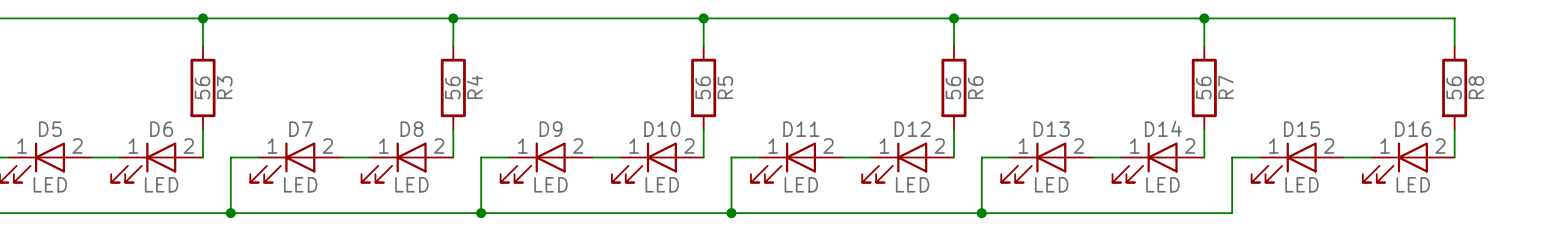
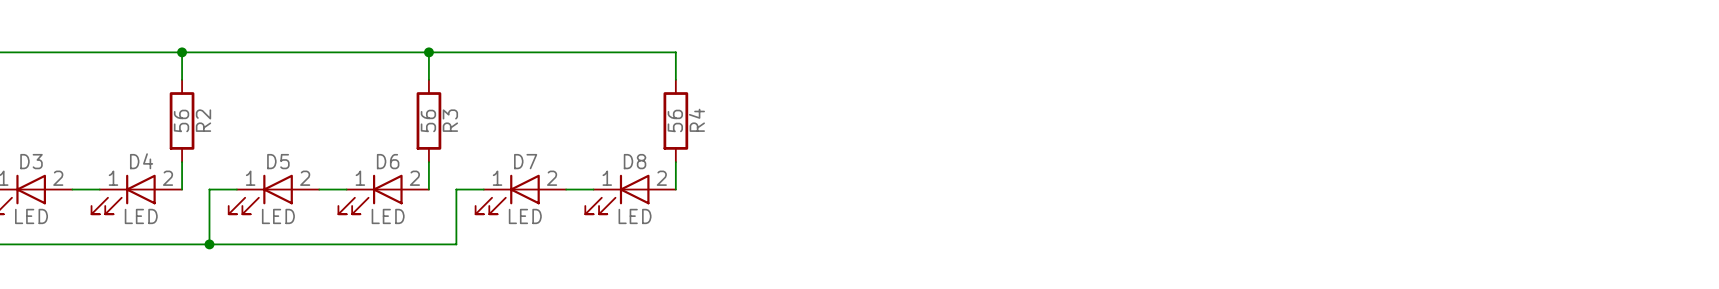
wire: (453, 18) (1454, 18) (1454, 46) -> none
junction: (453, 18) -> none
wire: (703, 18) (703, 46) -> none
junction: (703, 18) -> none
wire: (953, 18) (953, 46) -> none
junction: (953, 18) -> none
wire: (1204, 18) (1204, 46) -> none
junction: (1204, 18) -> none
R5: 56 (703, 87) -> none
R6: 56 (953, 87) -> none
R7: 56 (1204, 87) -> none
R8: 56 (1454, 87) -> none
wire: (703, 129) (703, 157) -> none
wire: (953, 129) (953, 157) -> none
wire: (1204, 129) (1204, 157) -> none
wire: (1454, 129) (1454, 157) -> none
wire: (508, 157) (481, 157) (481, 213) -> none
wire: (592, 157) (620, 157) -> none
wire: (759, 157) (731, 157) (731, 213) -> none
wire: (842, 157) (870, 157) -> none
wire: (1009, 157) (981, 157) (981, 213) -> none
wire: (1093, 157) (1120, 157) -> none
wire: (1259, 157) (1232, 157) (1232, 213) (230, 213) -> none
wire: (1343, 157) (1371, 157) -> none
D9: LED (546, 162) -> none
D10: LED (657, 162) -> none
D11: LED (796, 162) -> none
D12: LED (908, 162) -> none
D13: LED (1047, 162) -> none
D14: LED (1158, 162) -> none
D15: LED (1297, 162) -> none
D16: LED (1408, 162) -> none
junction: (230, 213) -> none
junction: (481, 213) -> none
junction: (731, 213) -> none
junction: (981, 213) -> none

